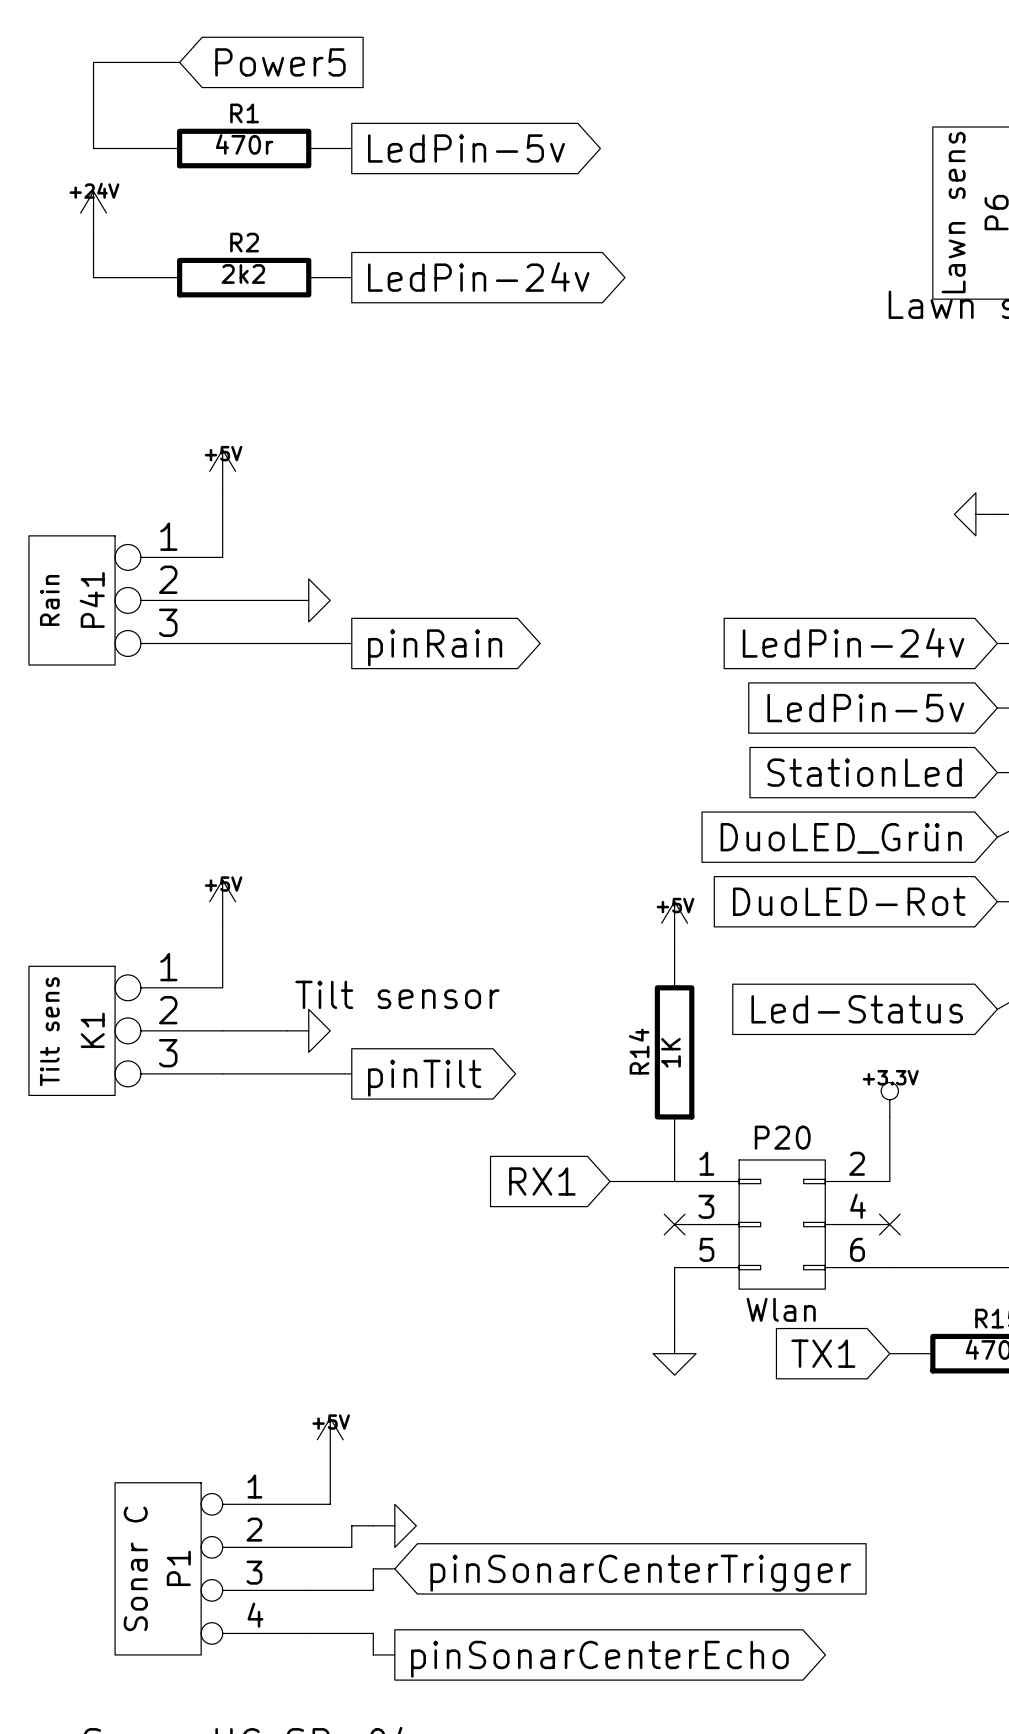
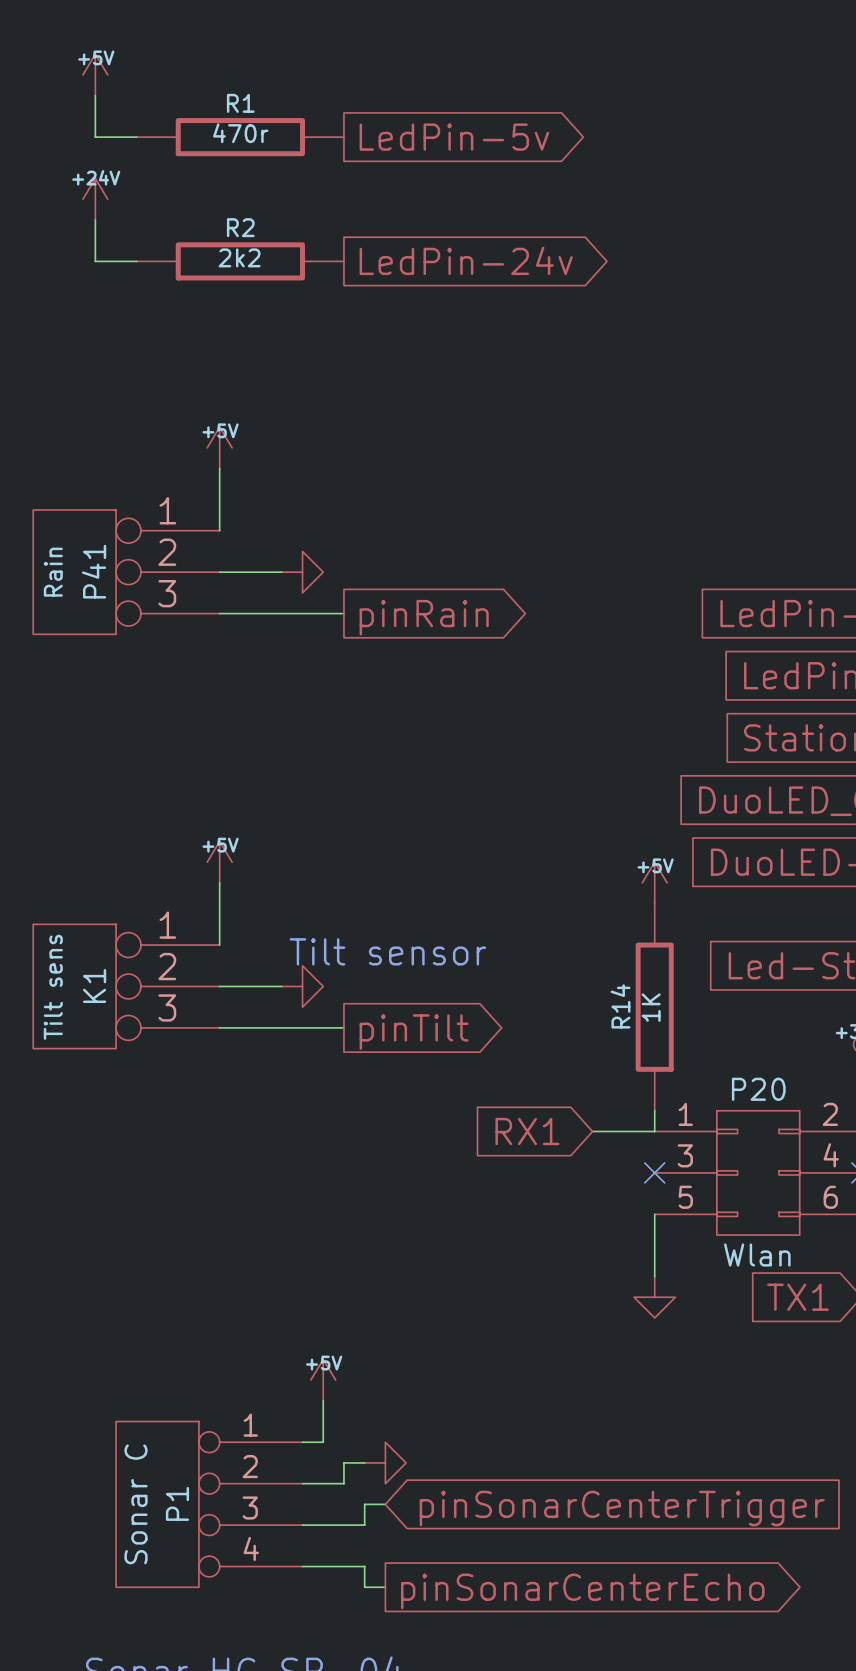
wire: (179, 62) (93, 62) (93, 105) -> none
global label: Power5 (280, 62) -> none
power symbol: none -> +5V (95, 74)

